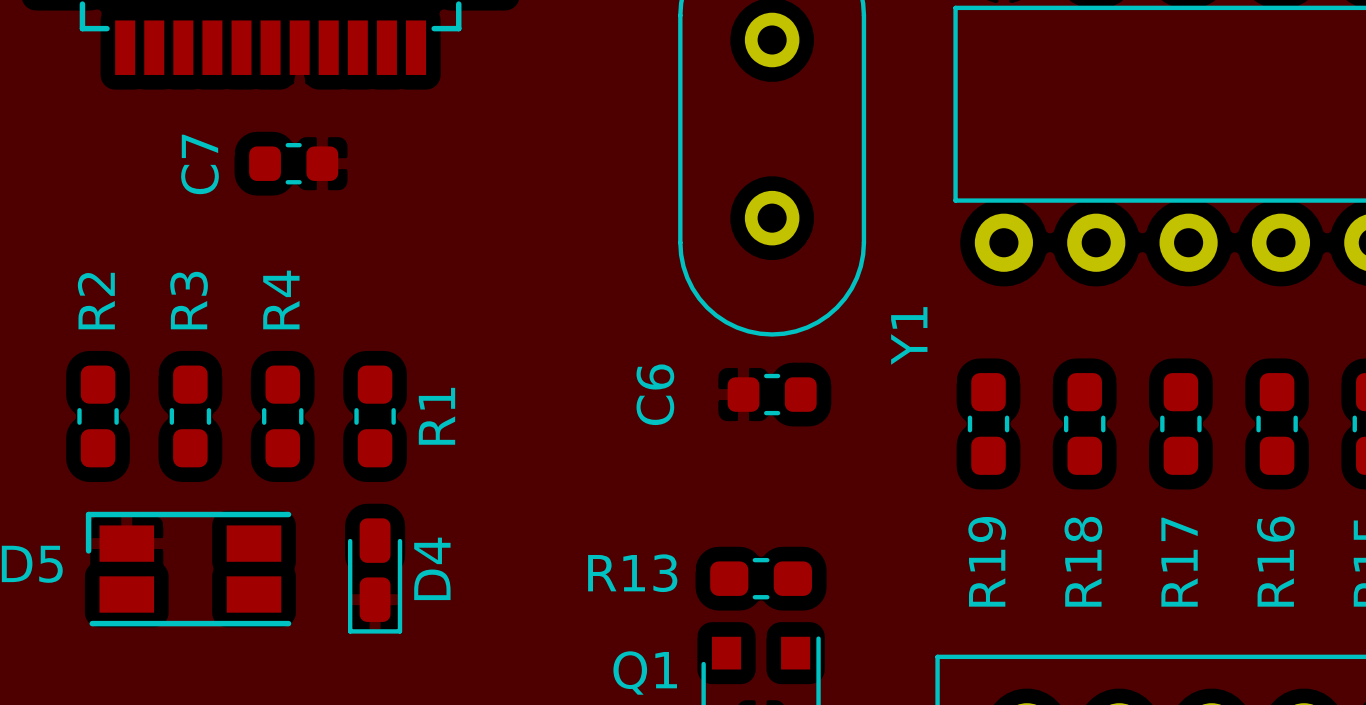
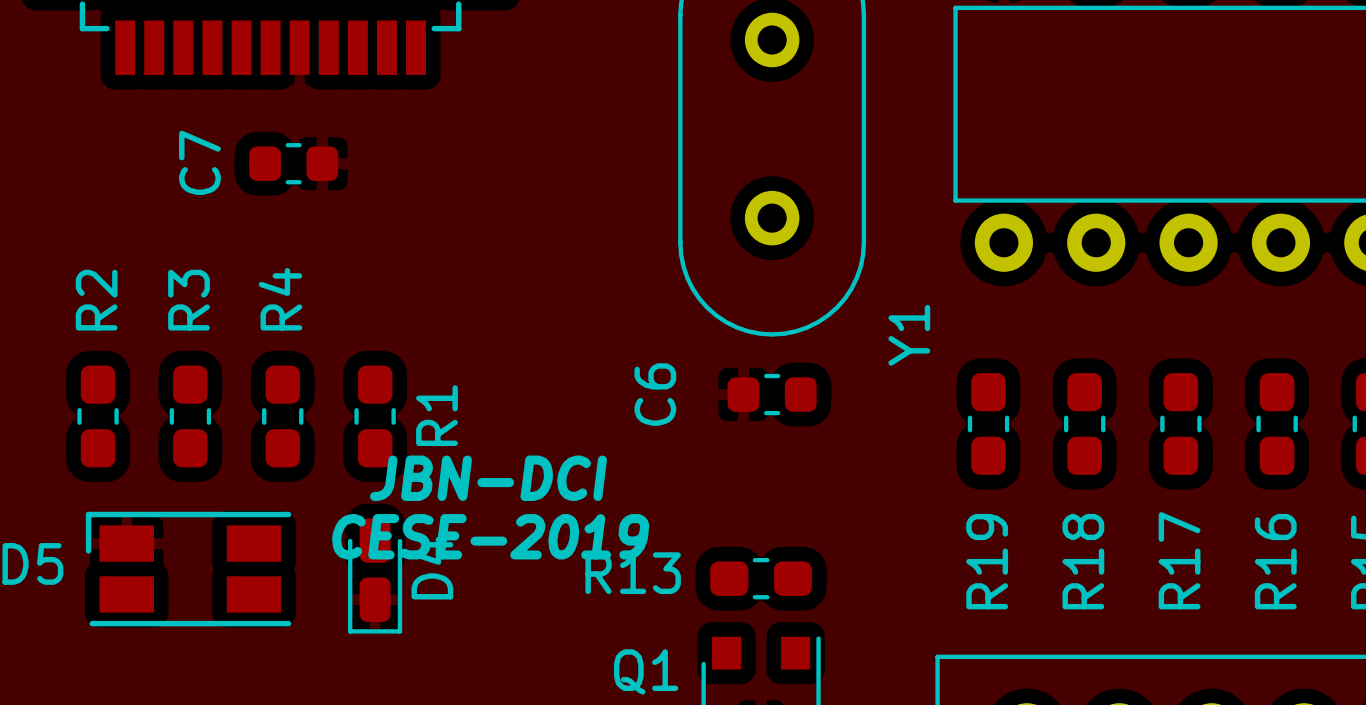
text: none -> JBN-DCI (488, 478)
text: none -> CESE-2019 (490, 536)

